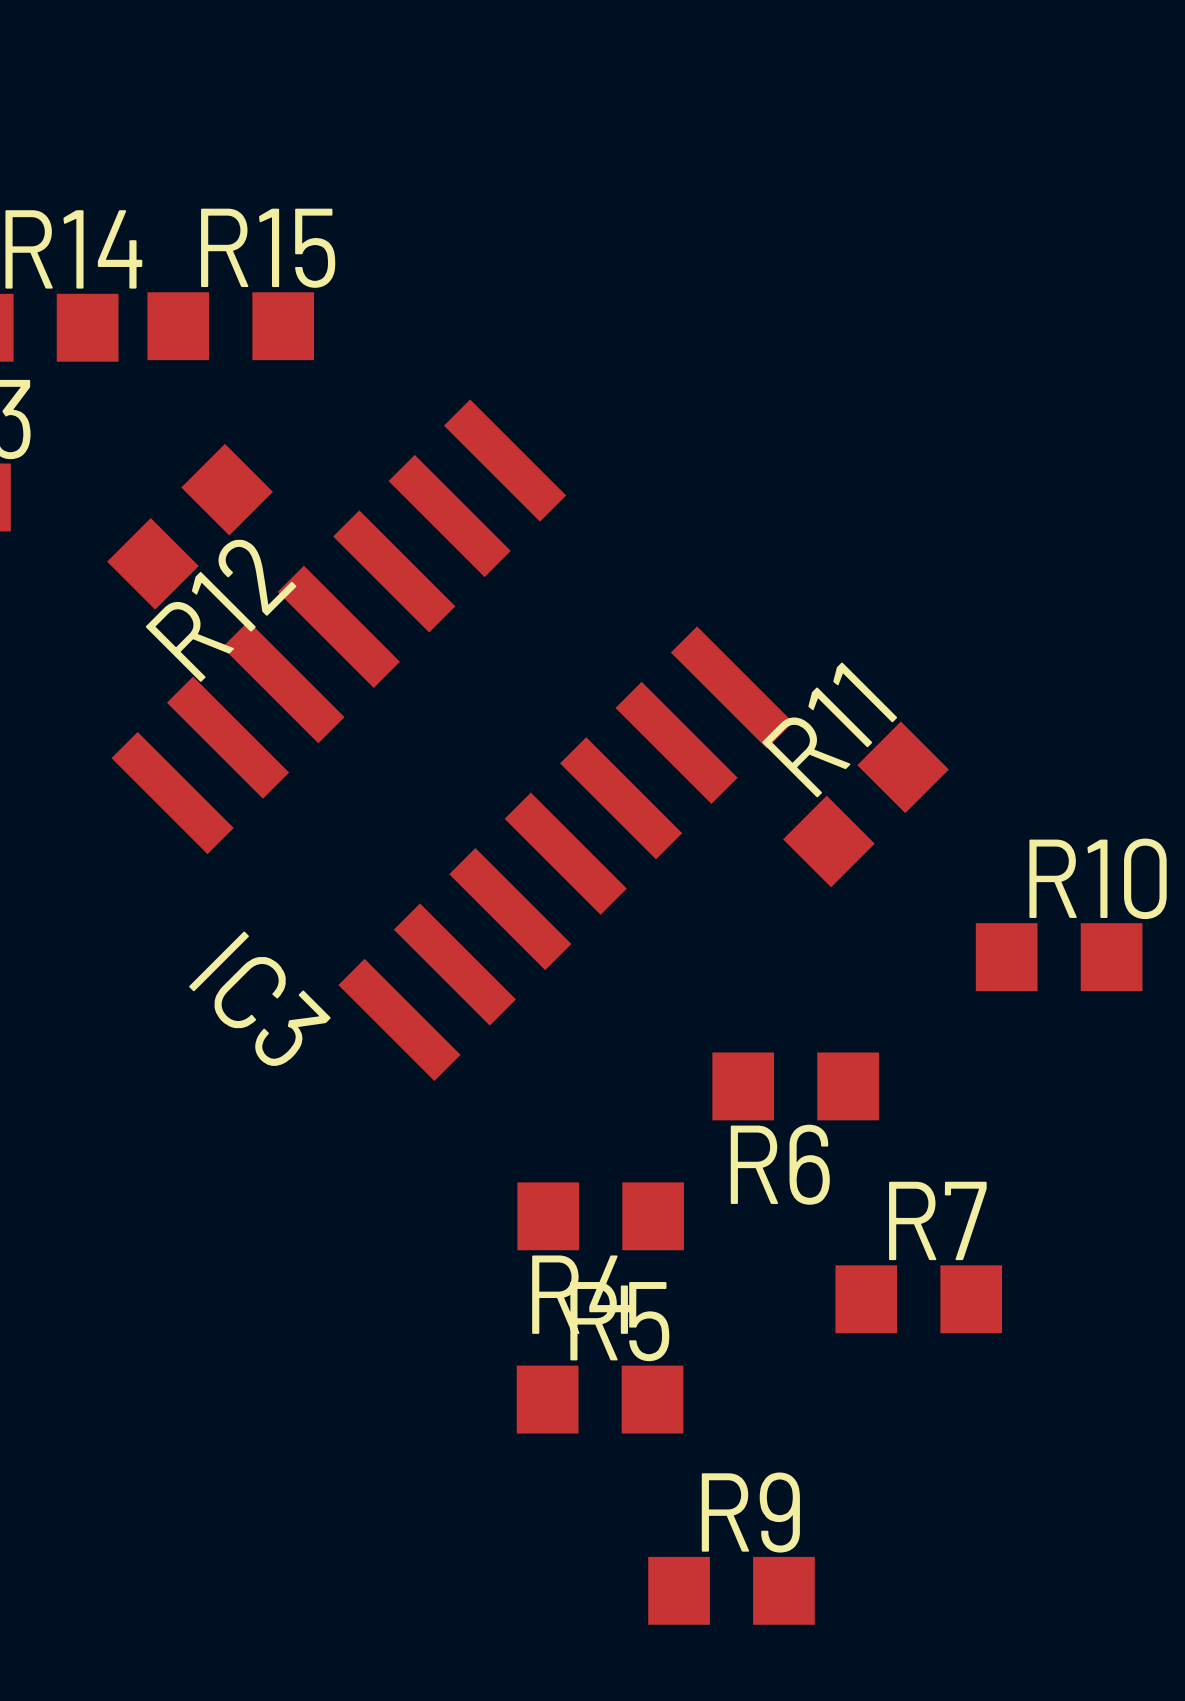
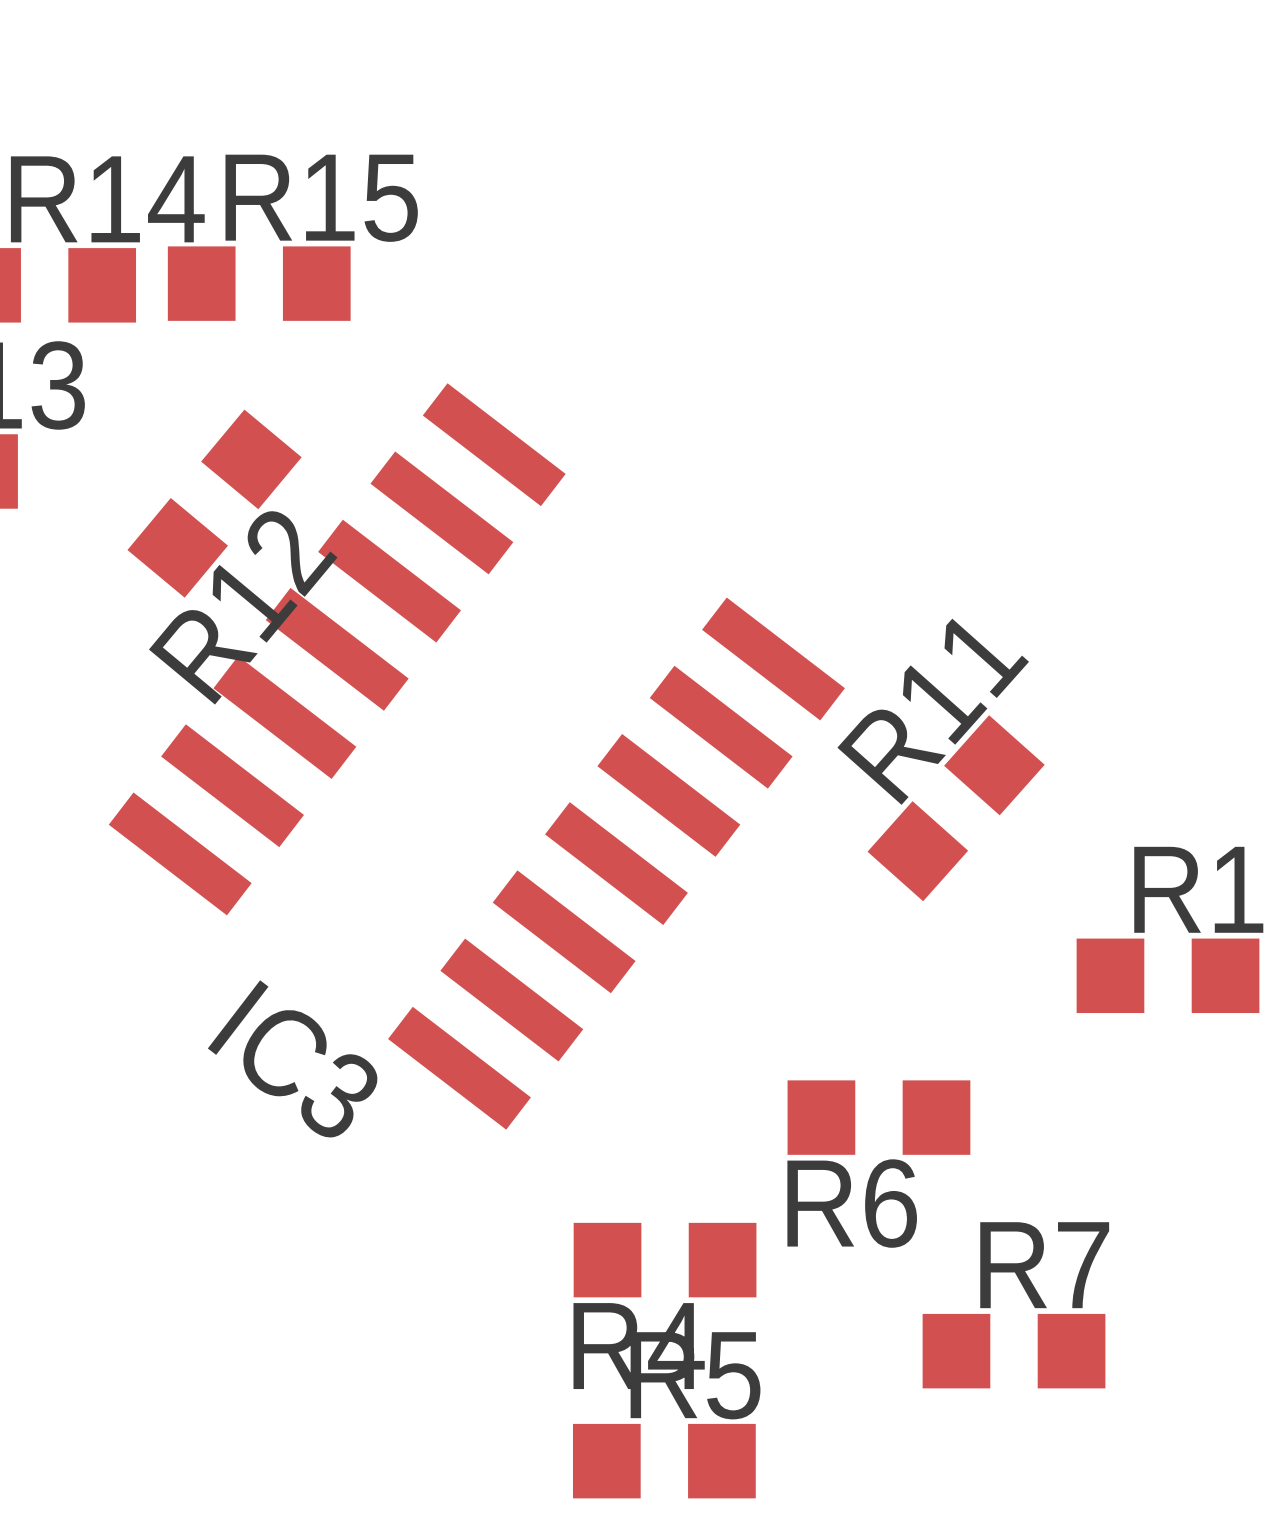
R12 rotation: 0° (190, 526) -> 5.2° counterclockwise (214, 503)
IC3 rotation: 0° (452, 740) -> 7.5° counterclockwise (476, 756)
R11 rotation: 0° (866, 804) -> 3.3° counterclockwise (956, 808)

